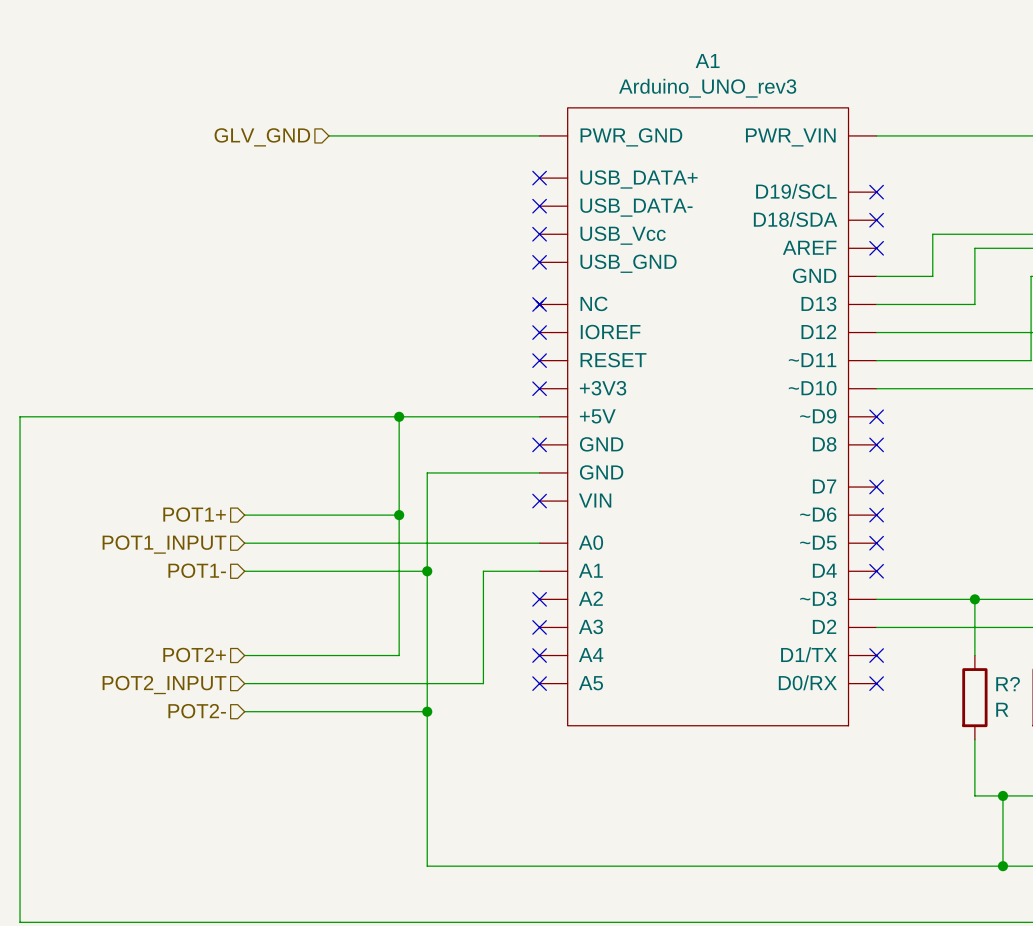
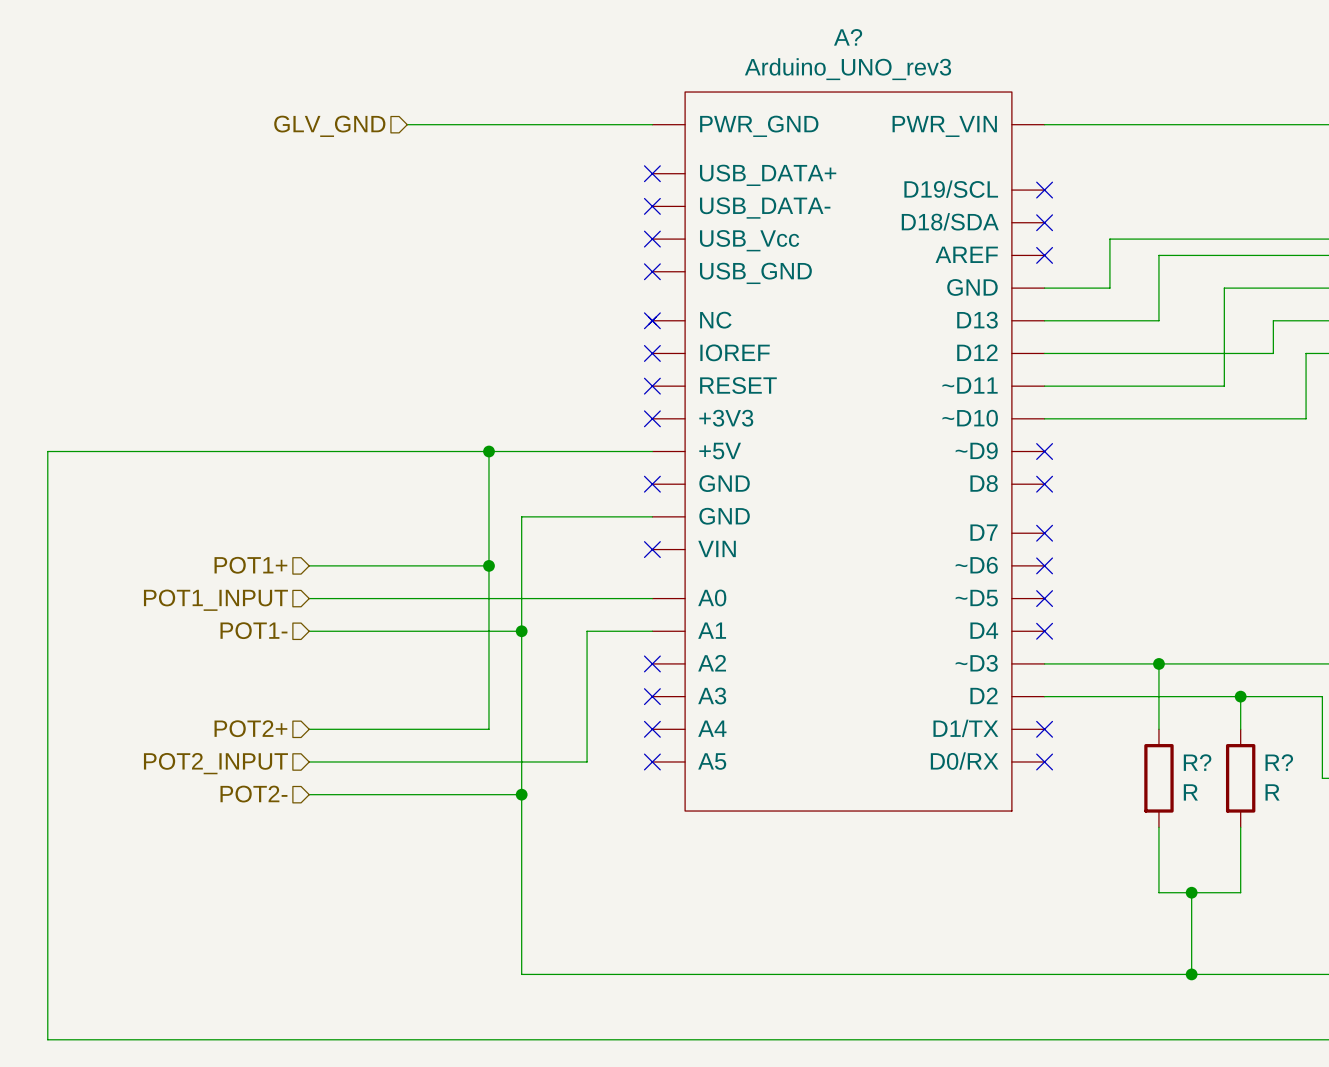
A1 name: A1 (707, 61) -> A? (848, 37)

